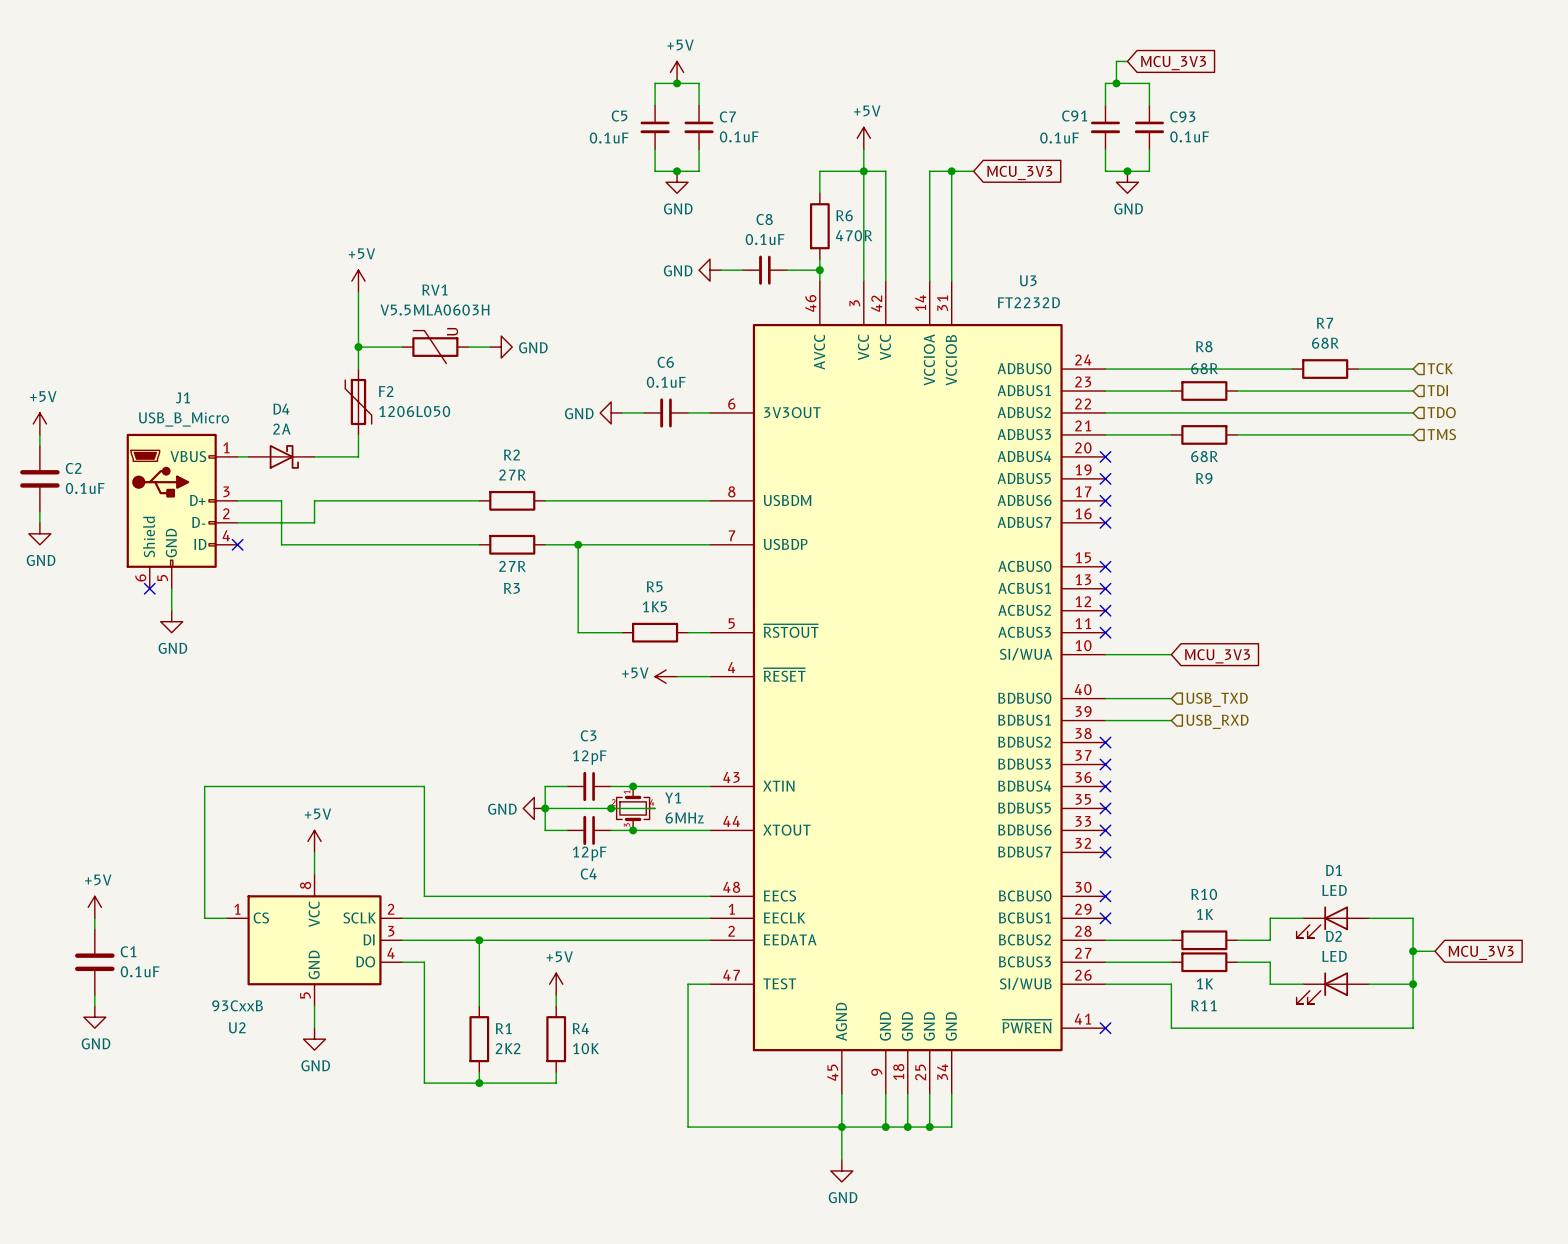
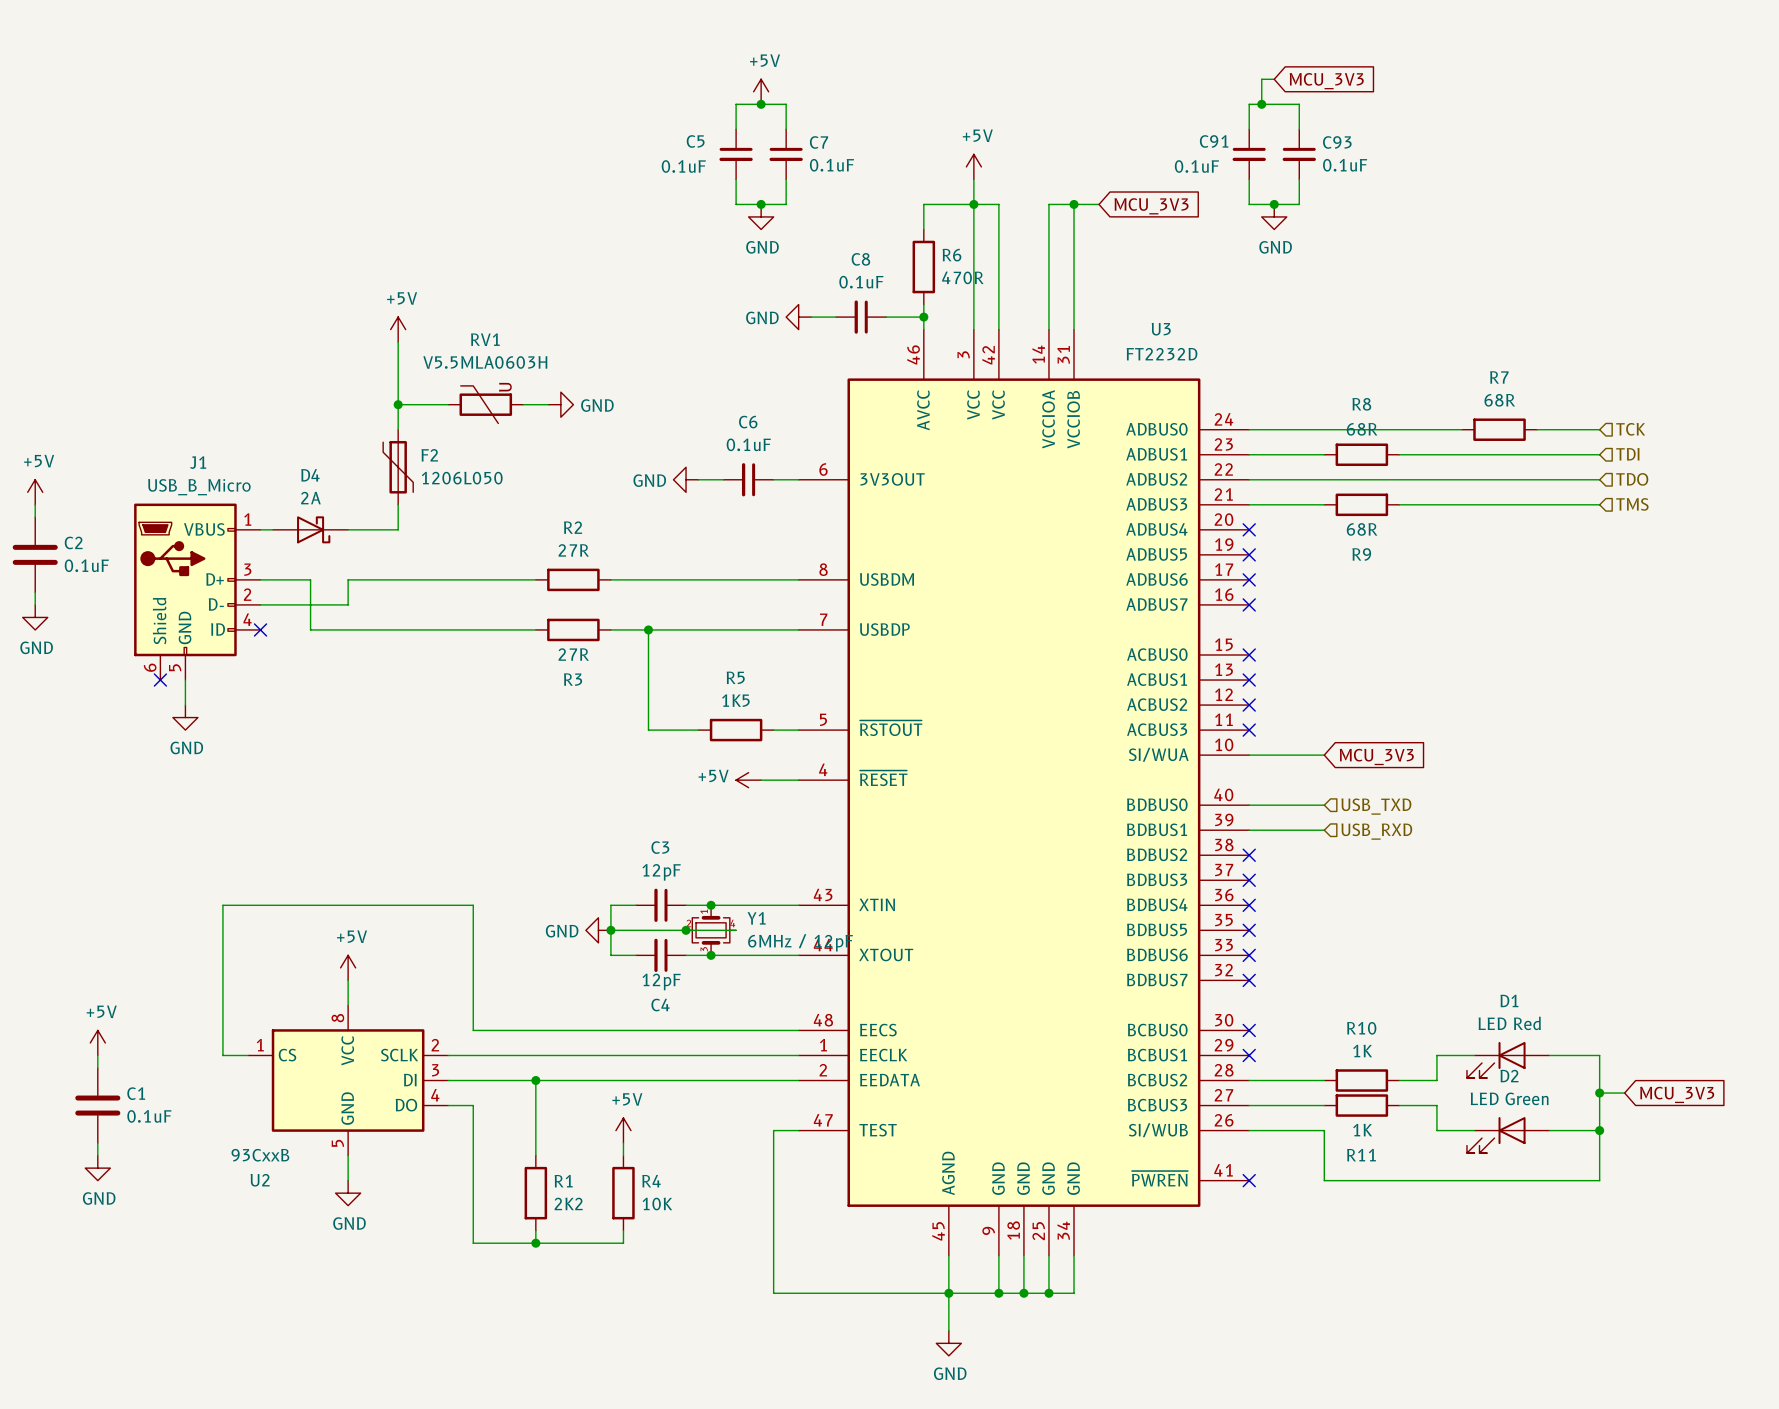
Y1 value: 6MHz (684, 817) -> 6MHz / 12pF (800, 942)
D1 value: LED (1334, 890) -> LED Red (1509, 1023)
D2 value: LED (1334, 956) -> LED Green (1509, 1098)

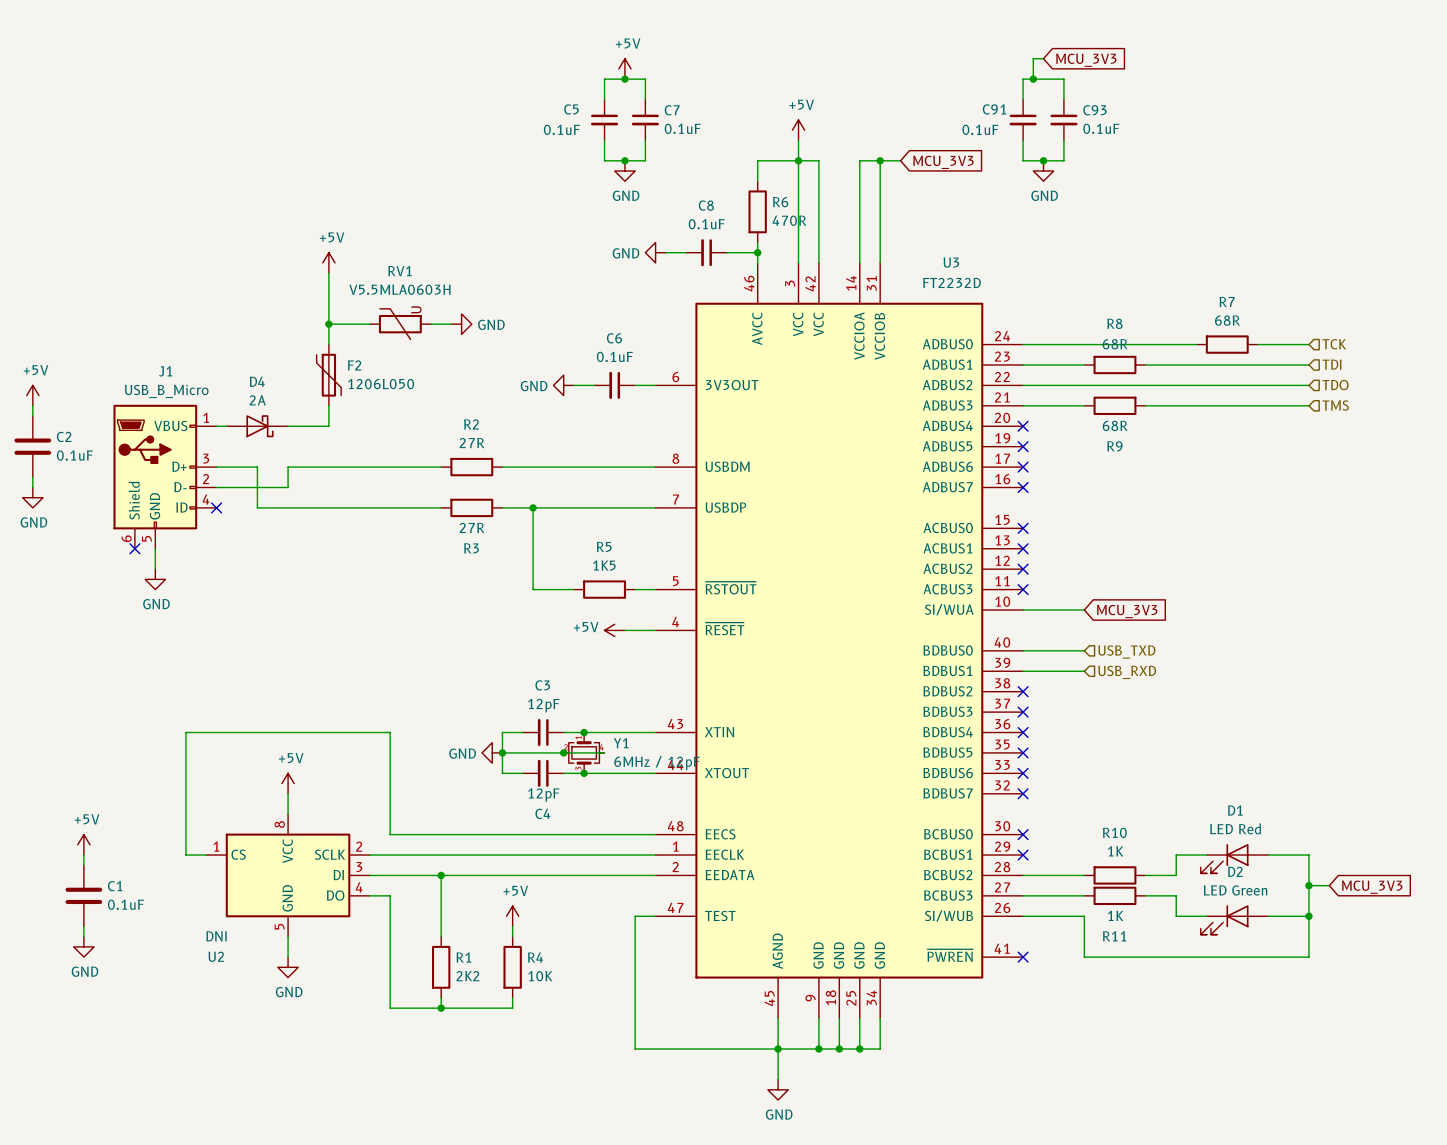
U2 value: 93CxxB (260, 1155) -> DNI (216, 936)

